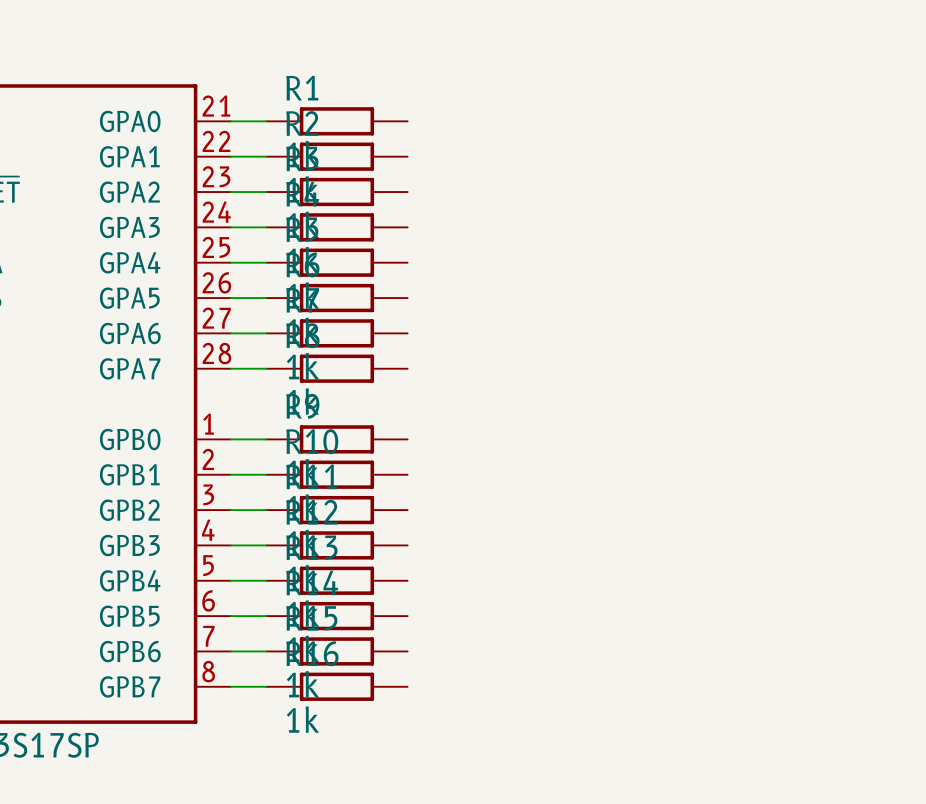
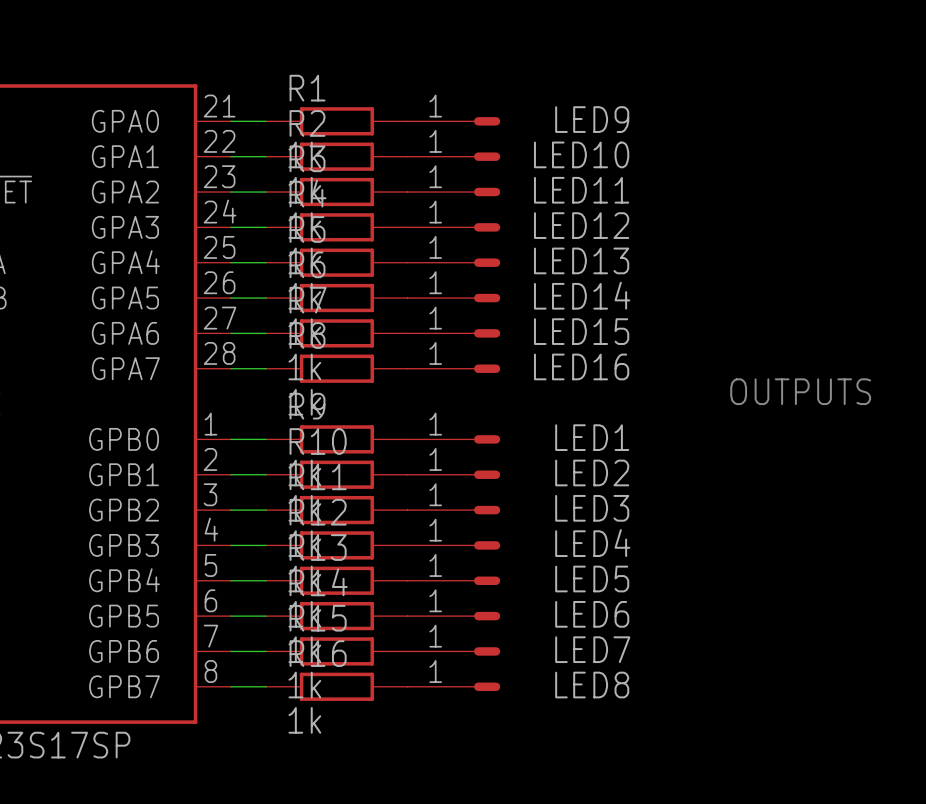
LED9: none -> (453, 121)
LED10: none -> (453, 156)
LED11: none -> (453, 192)
LED12: none -> (453, 227)
LED13: none -> (453, 262)
LED14: none -> (453, 298)
LED15: none -> (453, 333)
LED16: none -> (453, 368)
text: none -> OUTPUTS (800, 391)
LED1: none -> (453, 439)
LED2: none -> (453, 474)
LED3: none -> (453, 510)
LED4: none -> (453, 545)
LED5: none -> (453, 580)
LED6: none -> (453, 616)
LED7: none -> (453, 651)
LED8: none -> (453, 686)

